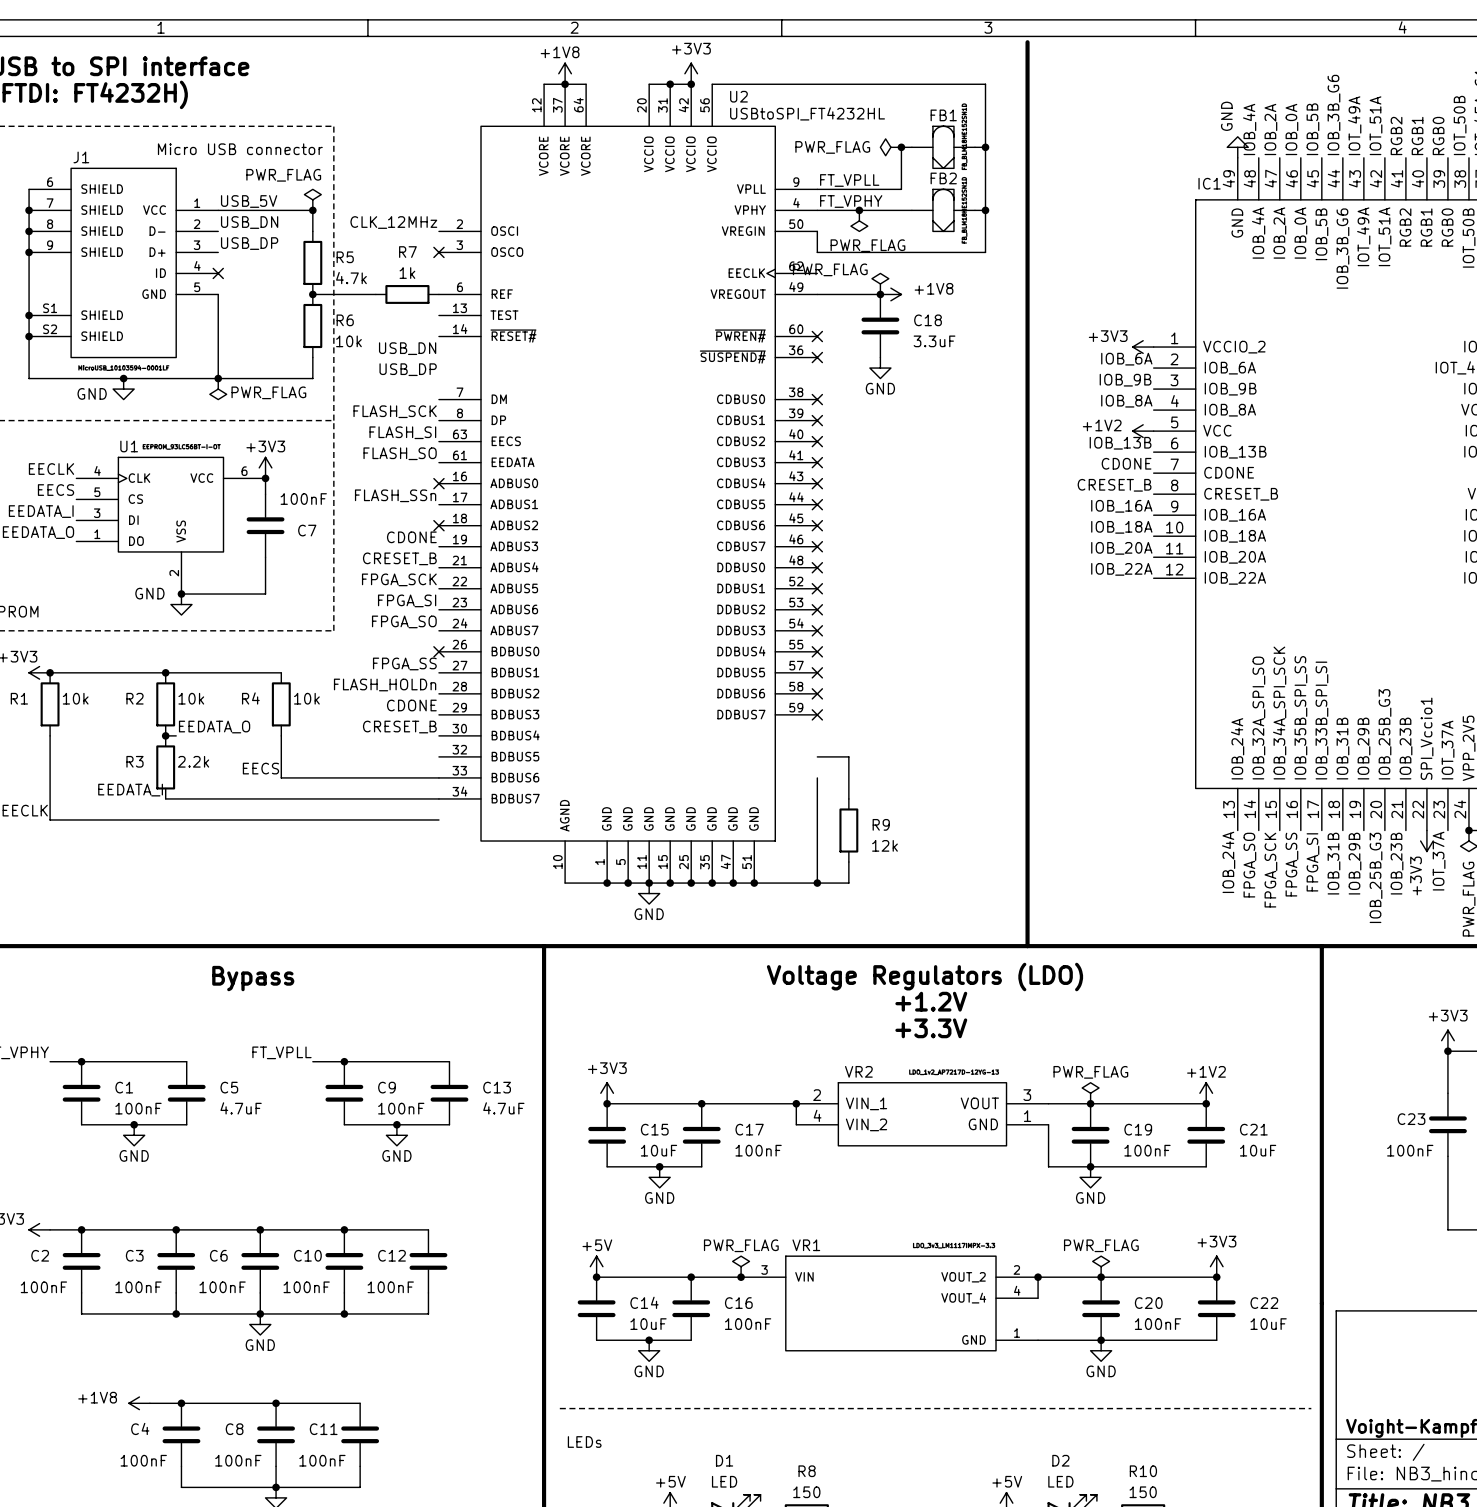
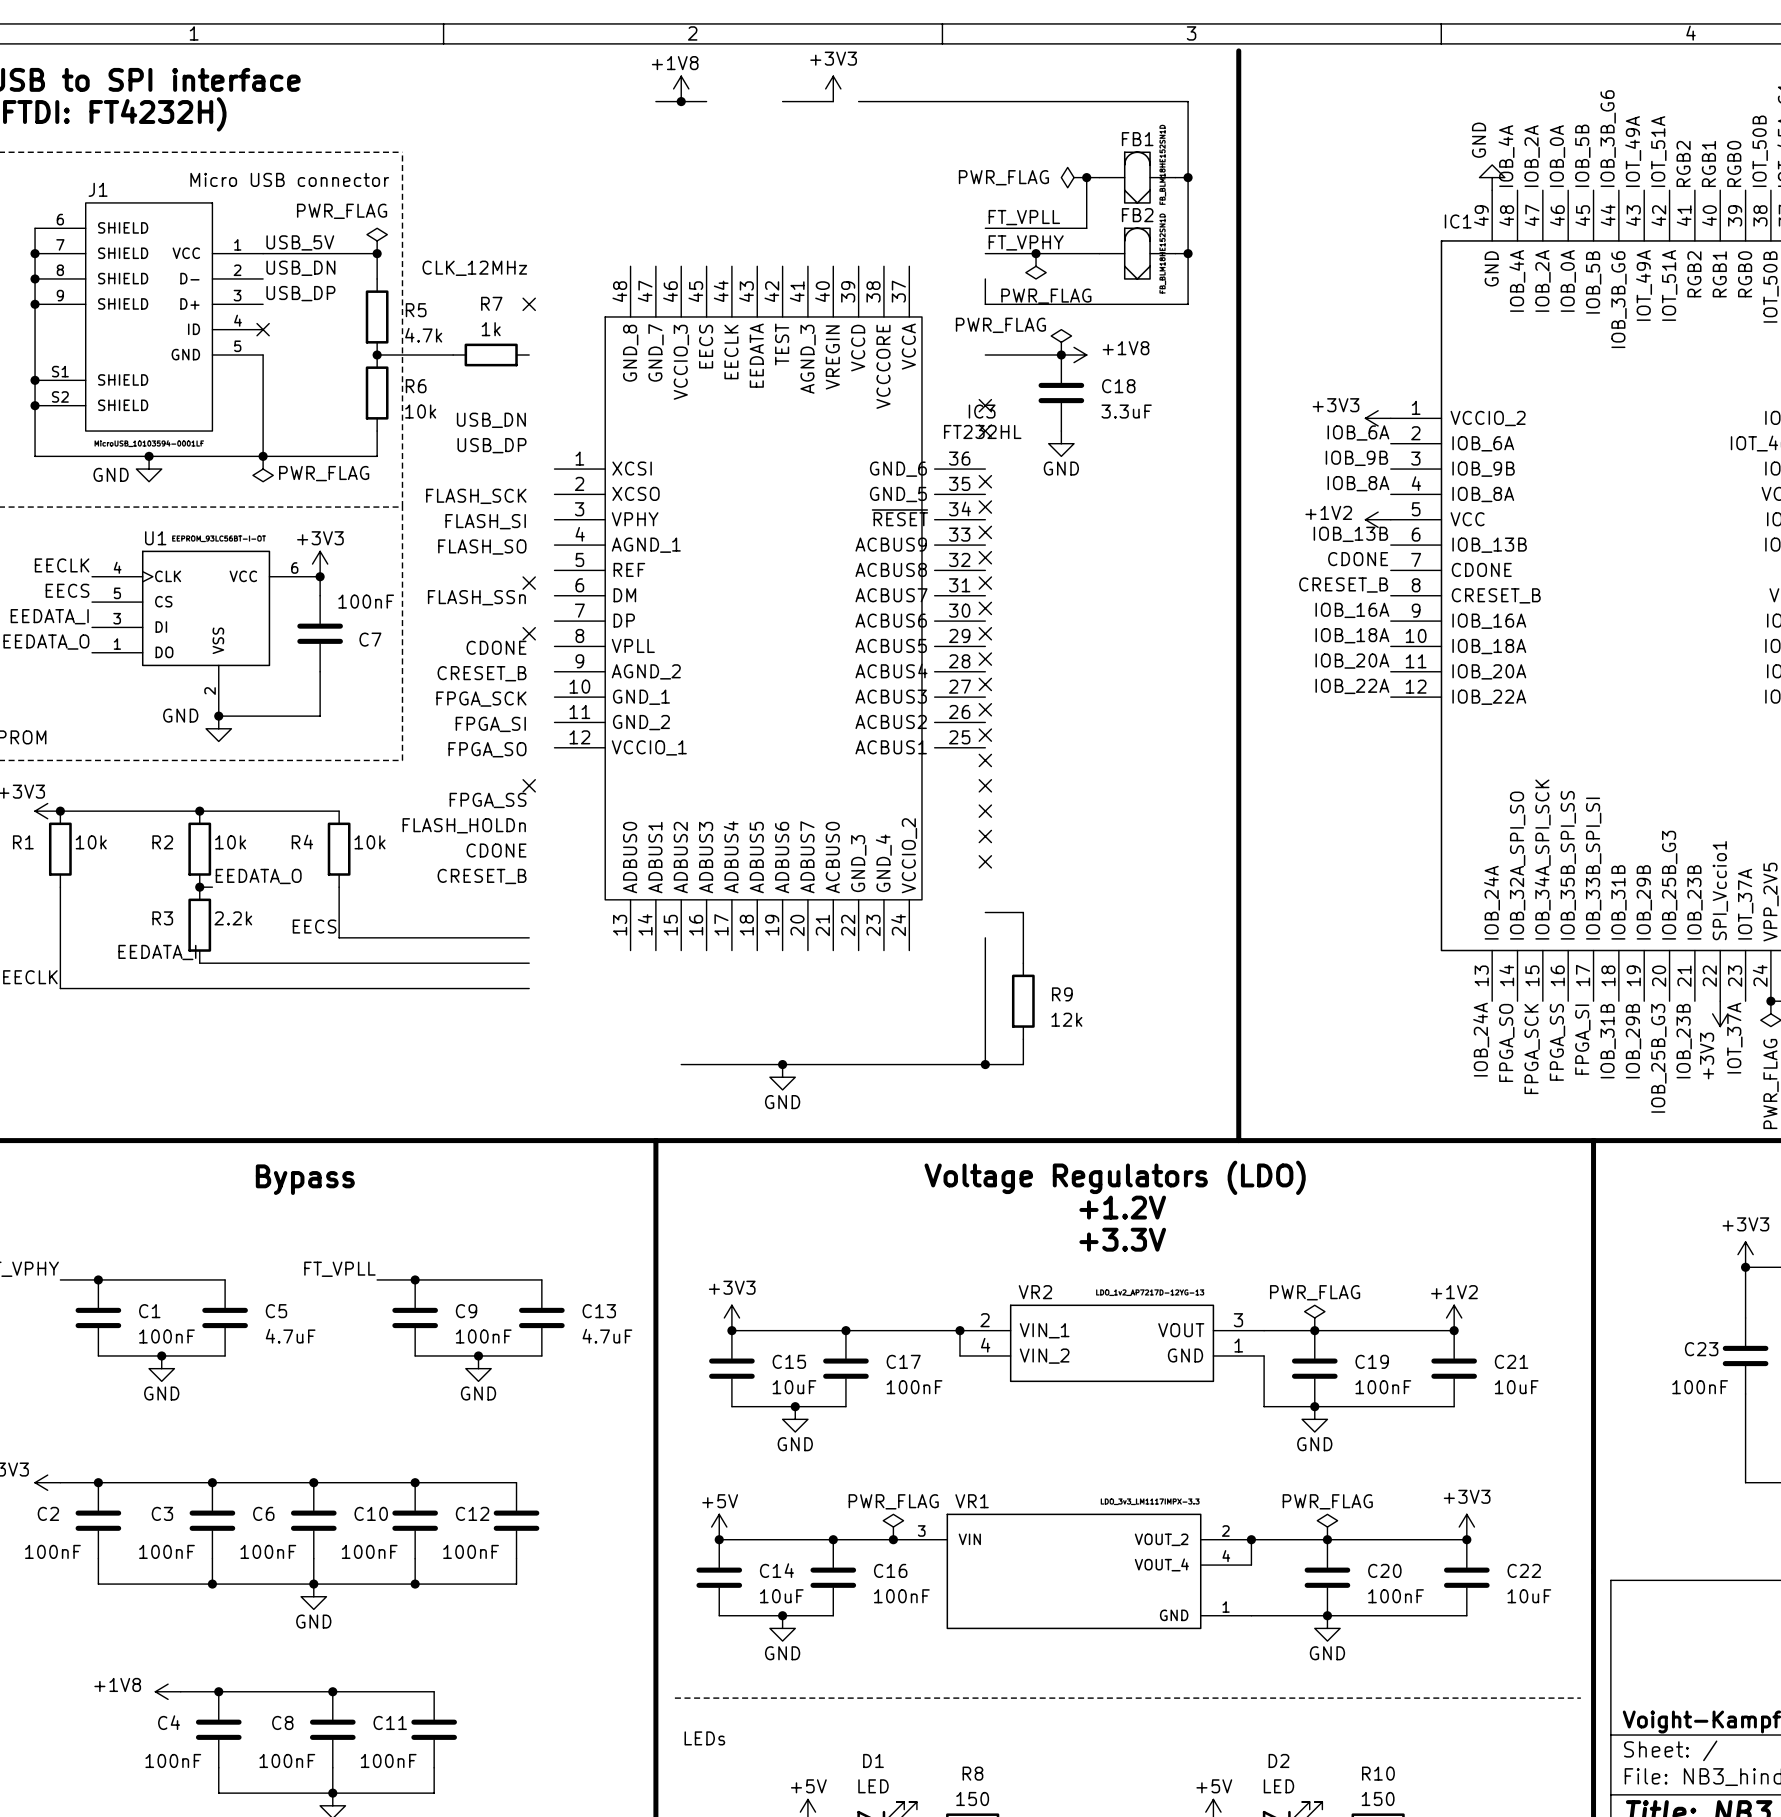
junction: (670, 84) -> none
junction: (691, 84) -> none
U2: USBtoSPI_FT4232HL (628, 483) -> none
IC3: none -> FT232HL (769, 608)
junction: (607, 883) -> none
junction: (628, 883) -> none
junction: (670, 883) -> none
junction: (691, 883) -> none
junction: (712, 883) -> none
junction: (733, 883) -> none
junction: (754, 883) -> none

